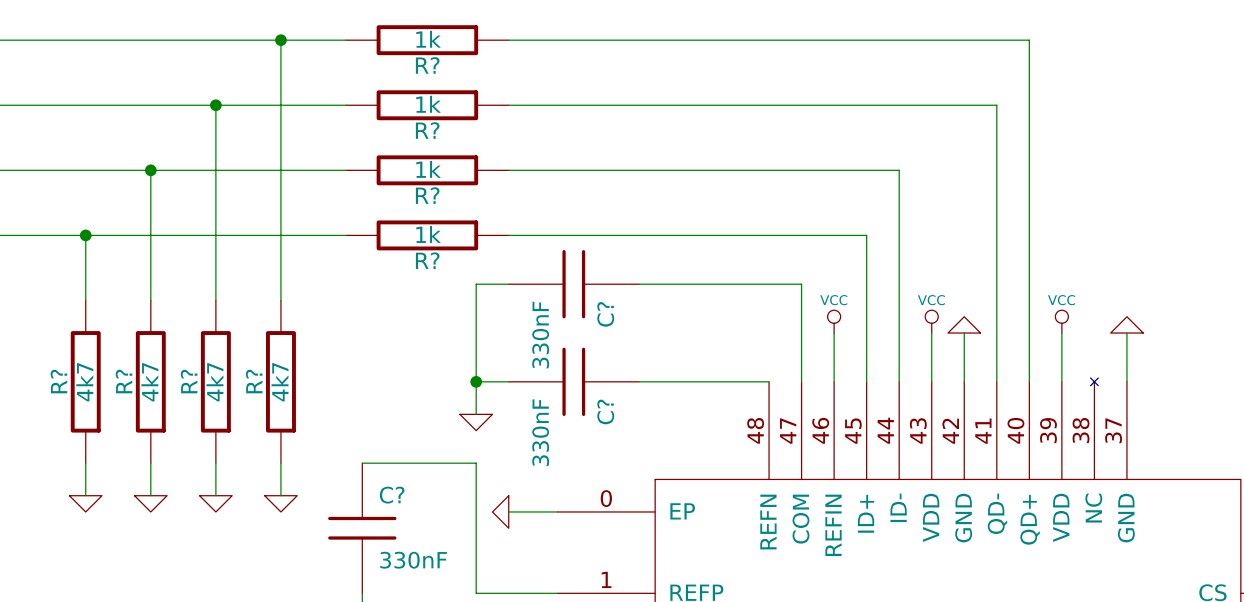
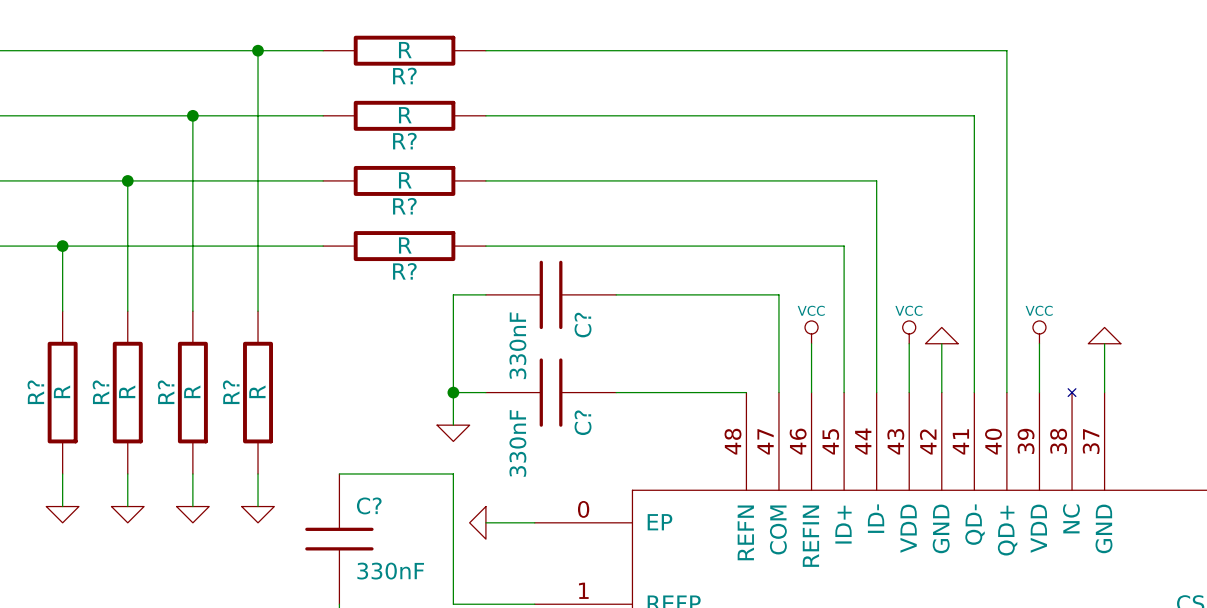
R? value: 1k (428, 39) -> R (405, 50)
R? value: 1k (428, 104) -> R (405, 115)
R? value: 1k (428, 169) -> R (405, 180)
R? value: 1k (428, 234) -> R (405, 245)
R? value: 4k7 (84, 382) -> R (62, 391)
R? value: 4k7 (149, 382) -> R (127, 391)
R? value: 4k7 (214, 382) -> R (192, 391)
R? value: 4k7 (280, 382) -> R (257, 391)

